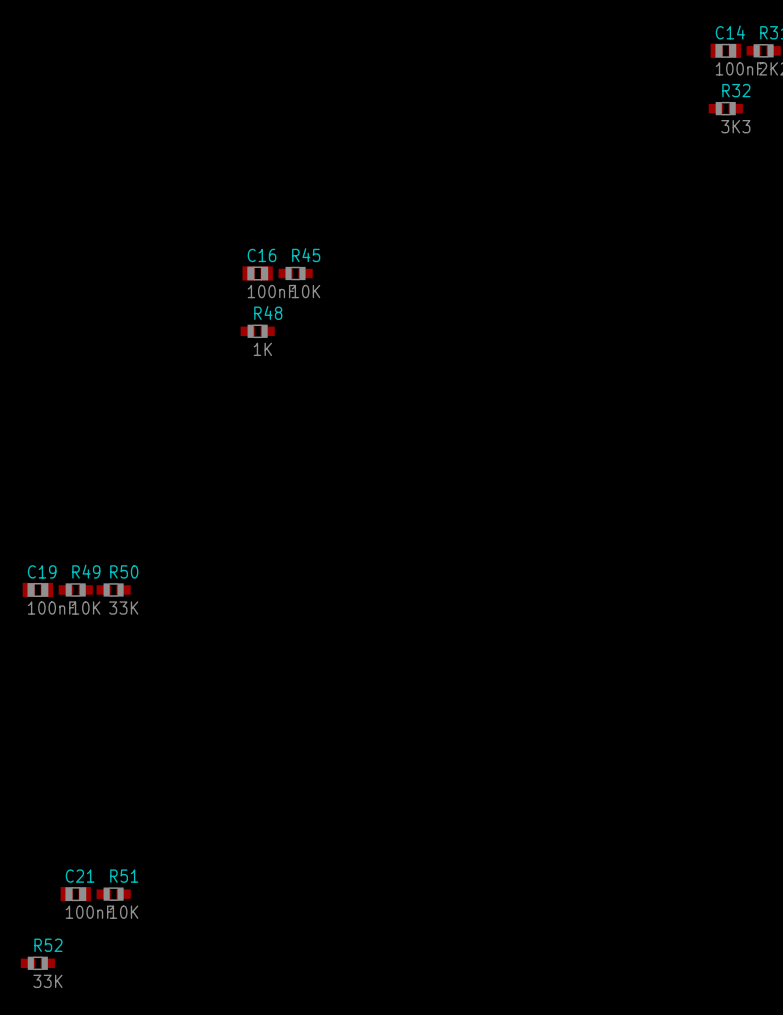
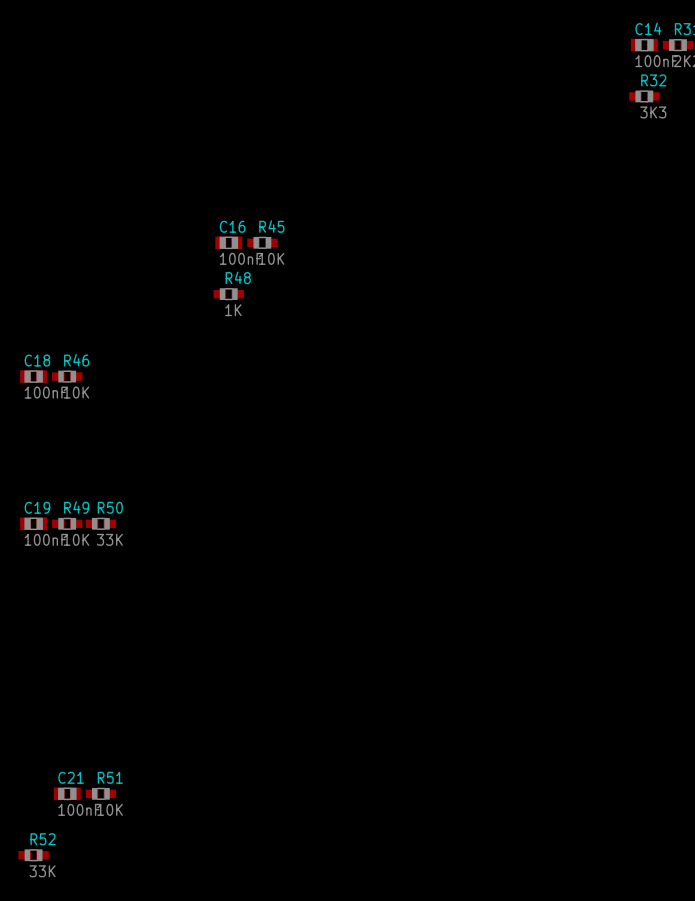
C18: none -> 100nF (33, 376)
R46: none -> 10K (67, 376)

